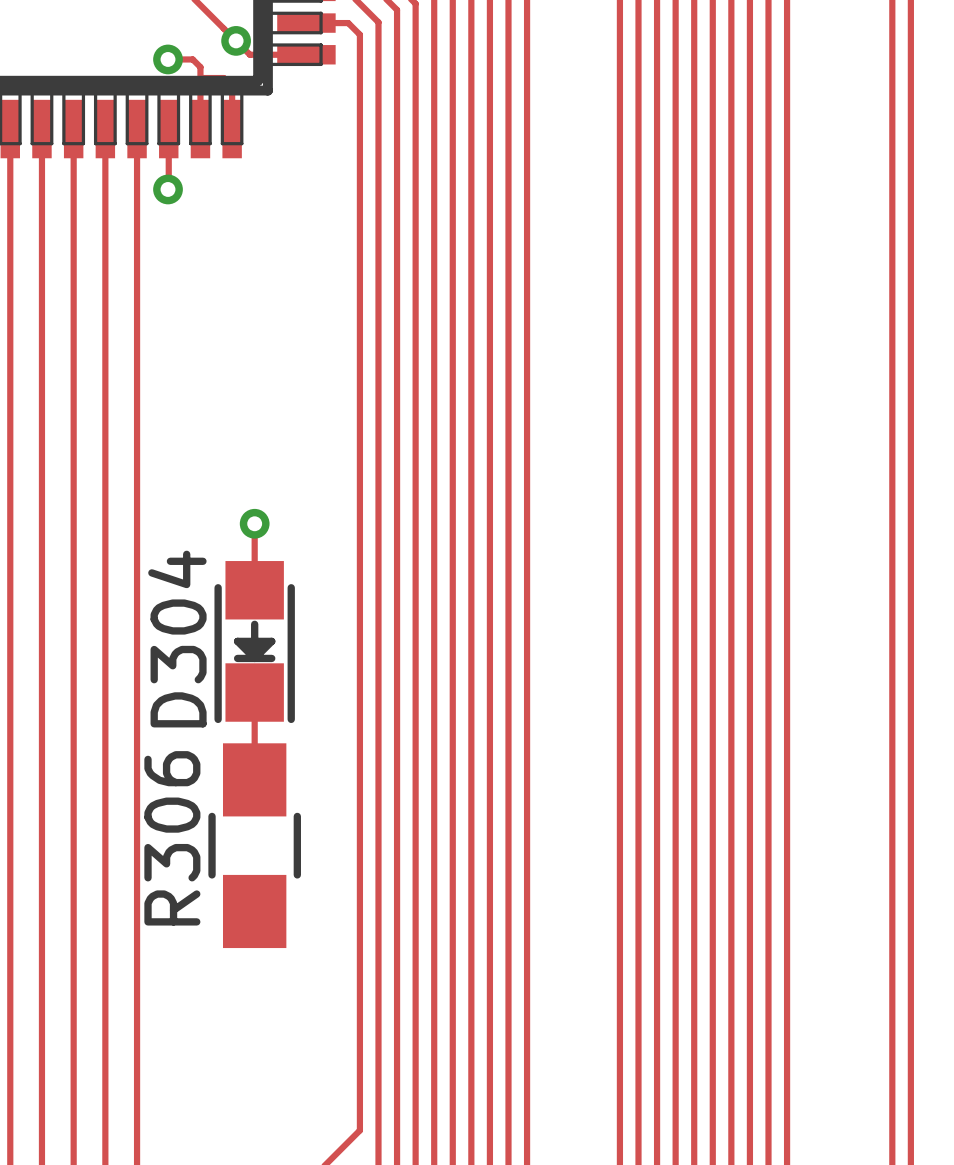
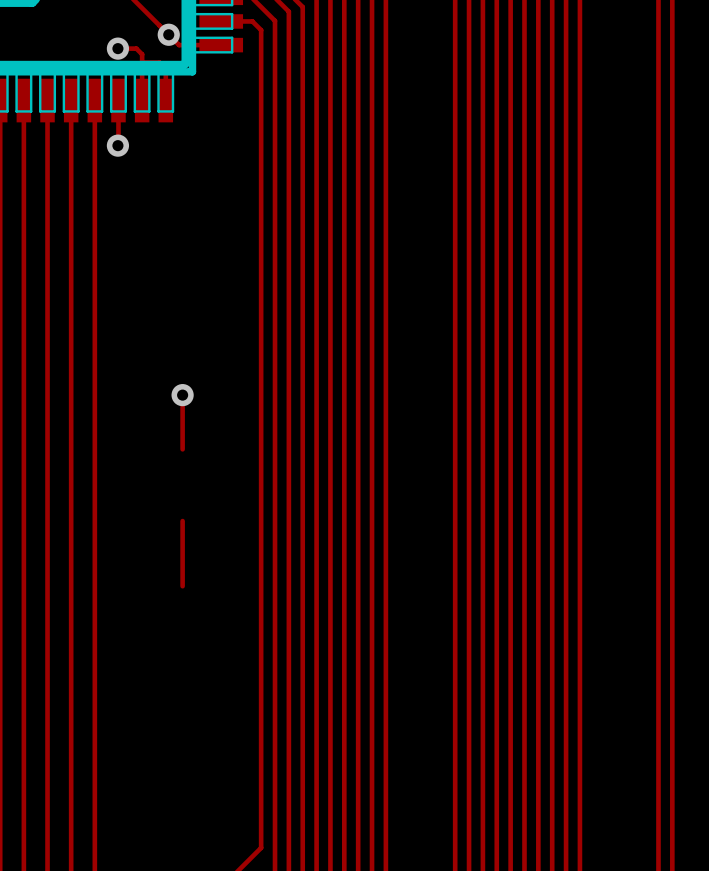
D304: (254, 642) -> none
R306: (254, 845) -> none

